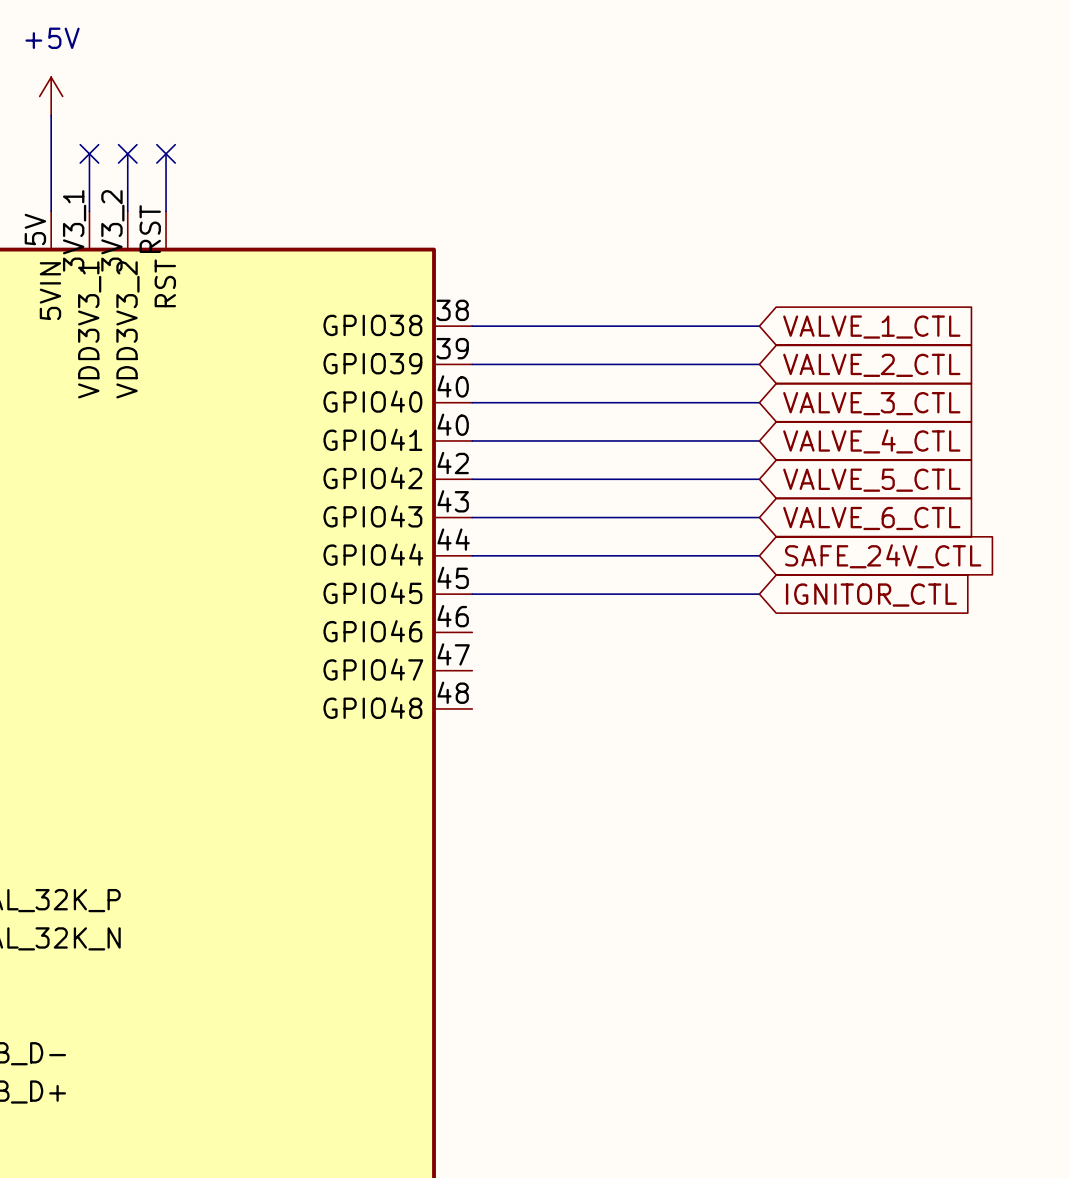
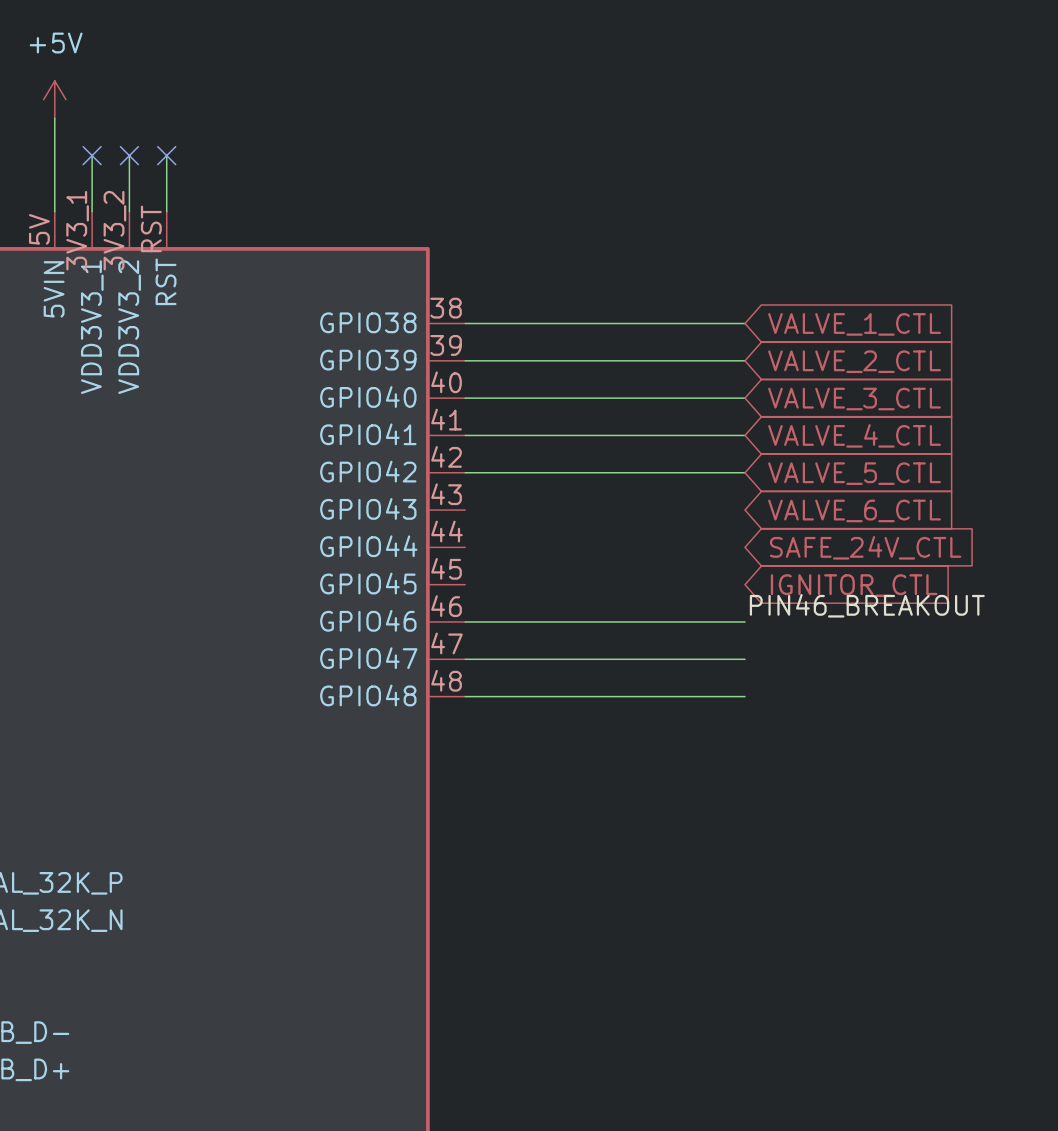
part pin number: 40 (453, 424) -> 41 (446, 419)
wire: (472, 517) (759, 517) -> (465, 621) (745, 621)
wire: (472, 555) (759, 555) -> (465, 659) (745, 659)
wire: (472, 594) (759, 594) -> (465, 696) (745, 696)
label: none -> PIN46_BREAKOUT (867, 605)

